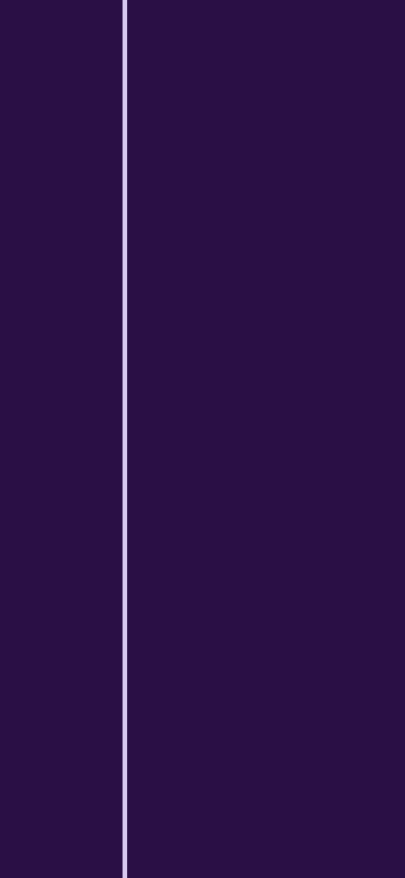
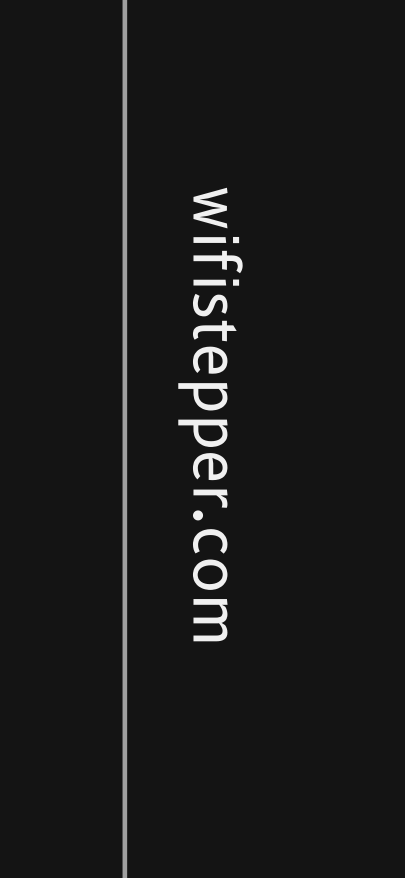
text: none -> wifistepper.com (210, 414)

